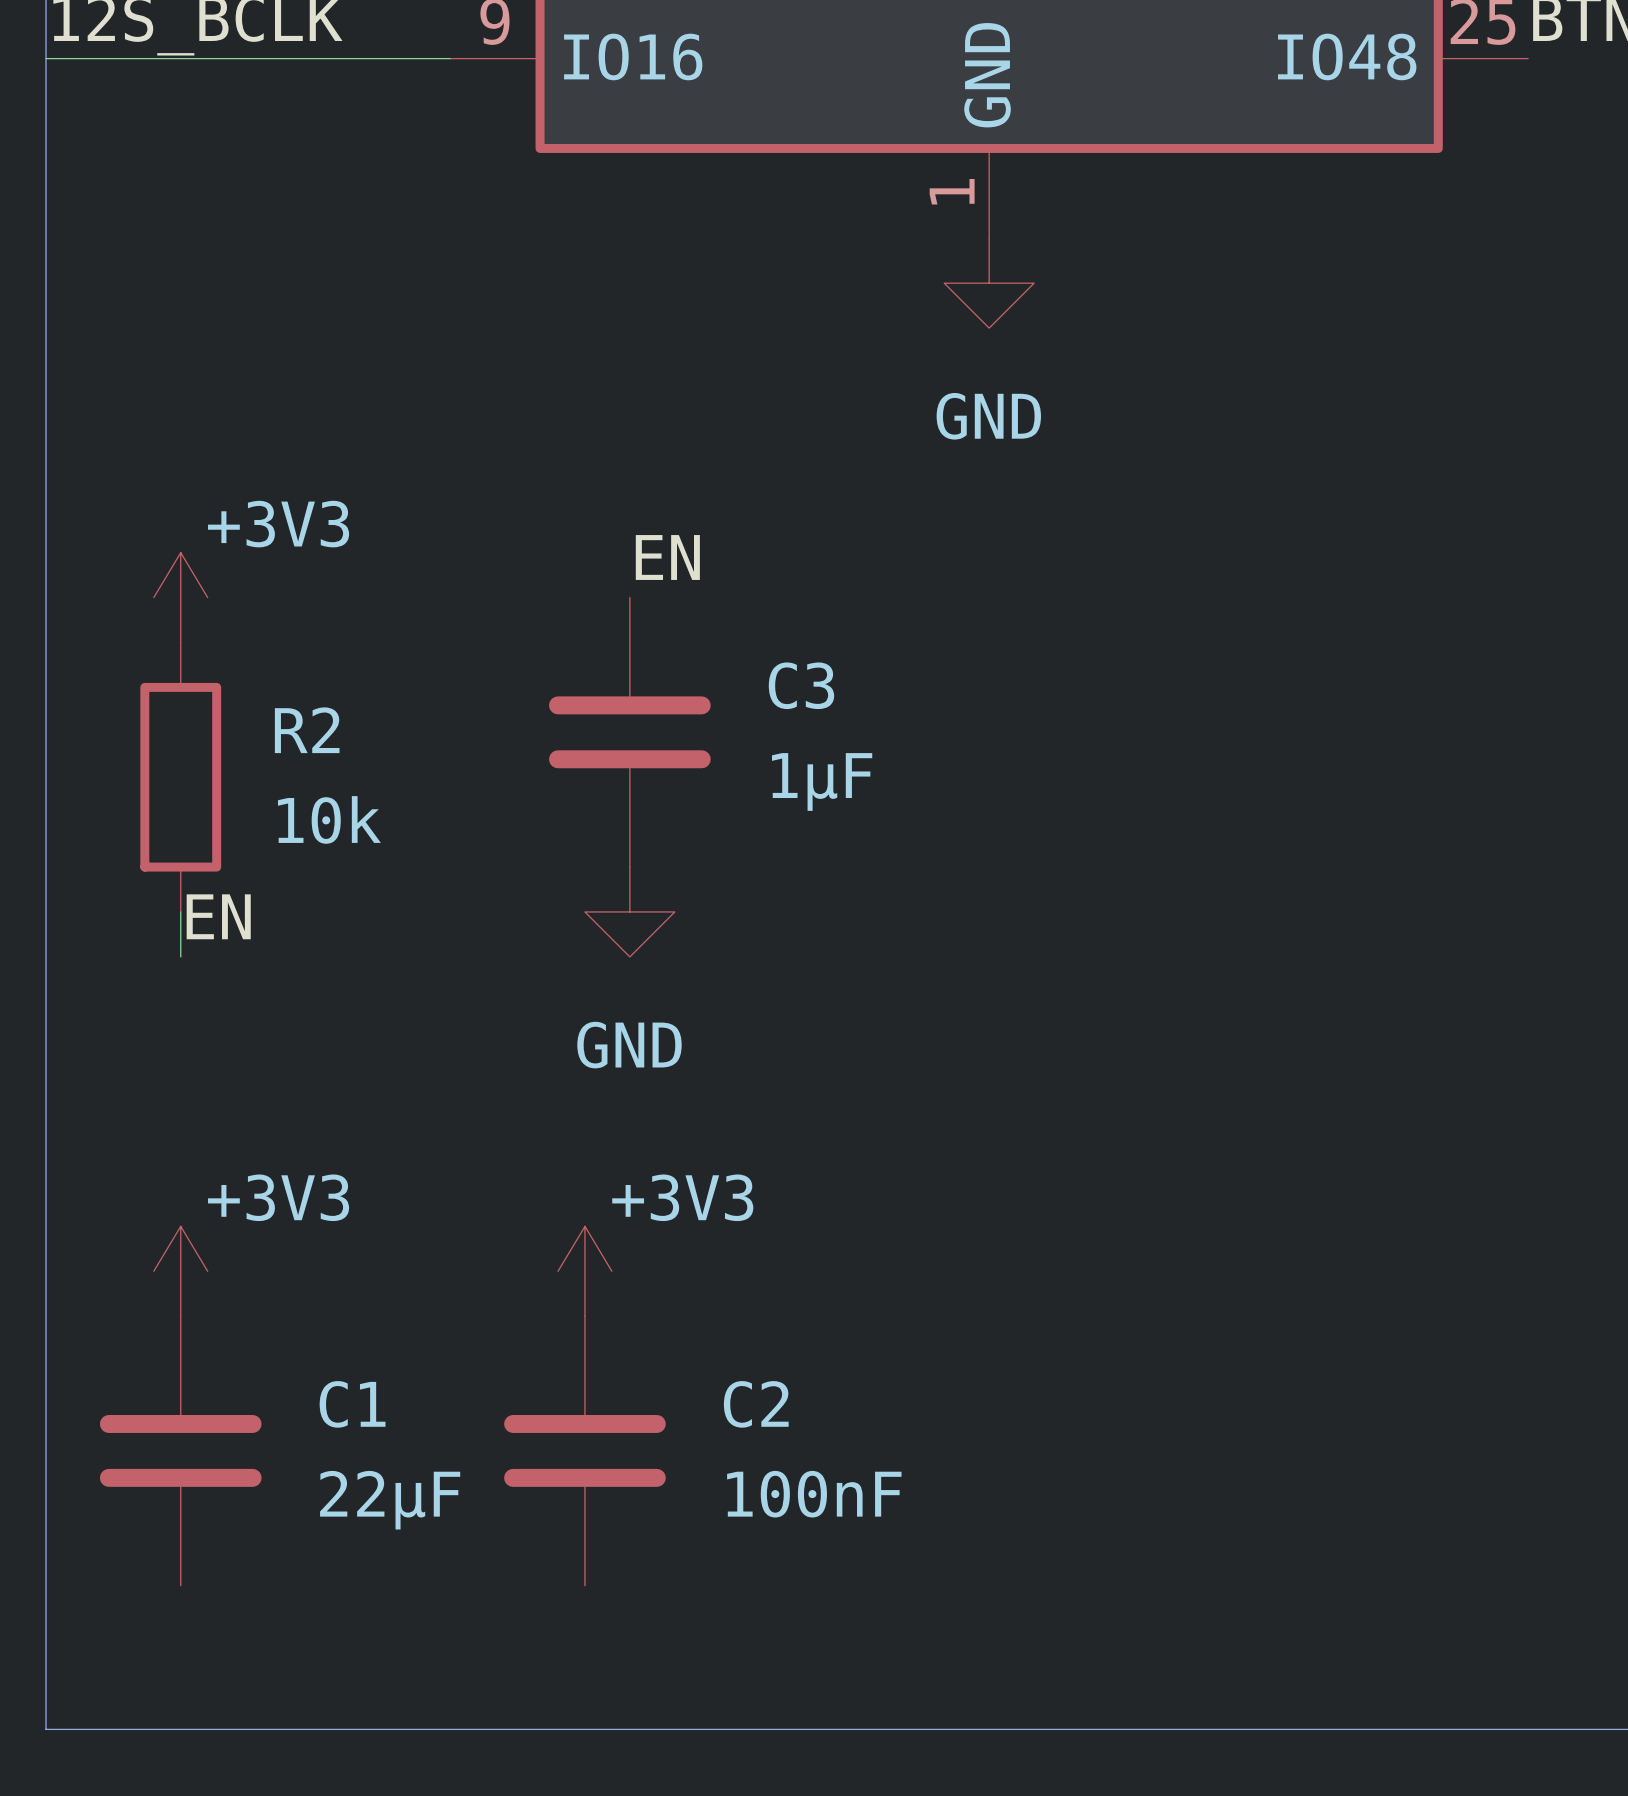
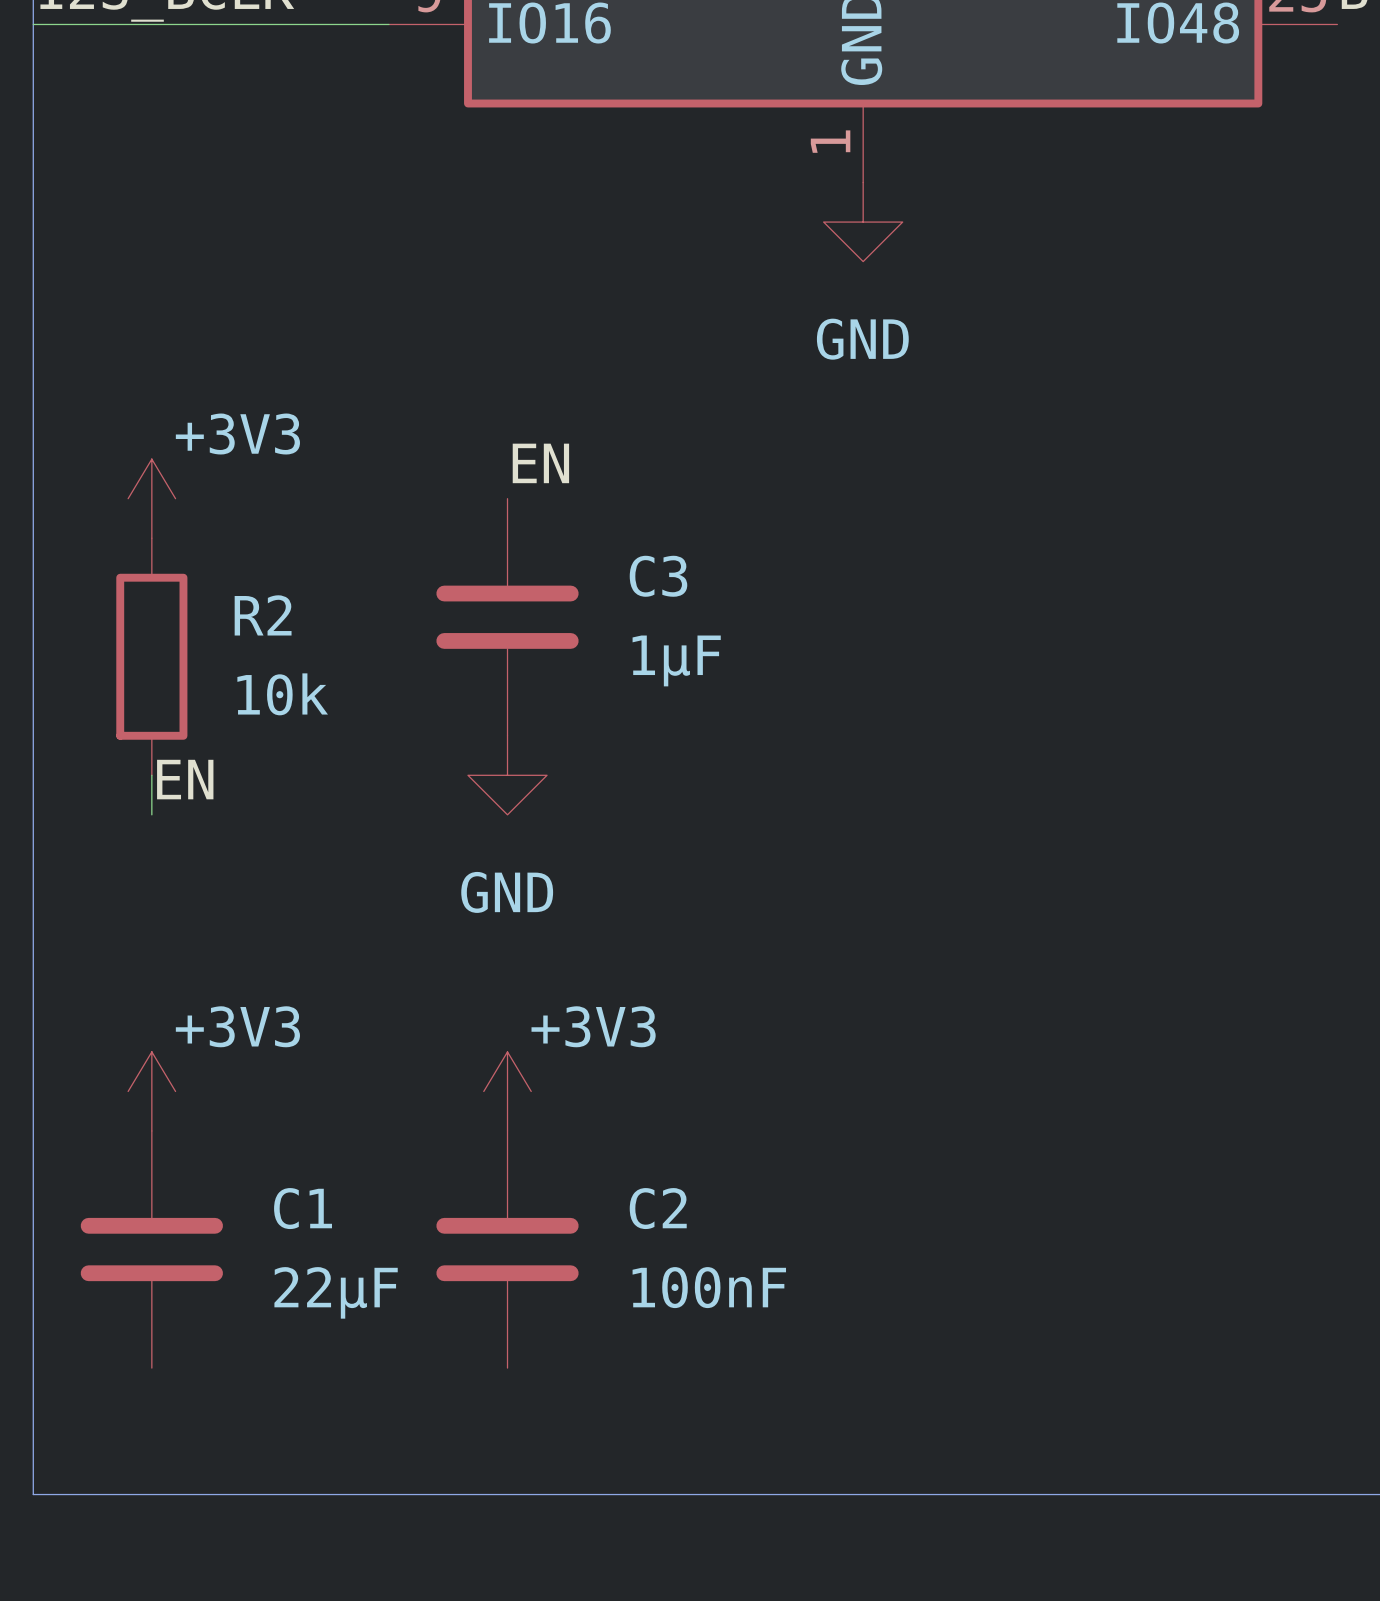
label position: EN (667, 557) -> EN (540, 463)
C3 position: (629, 732) -> (507, 617)
power symbol position: GND (629, 911) -> GND (507, 775)

